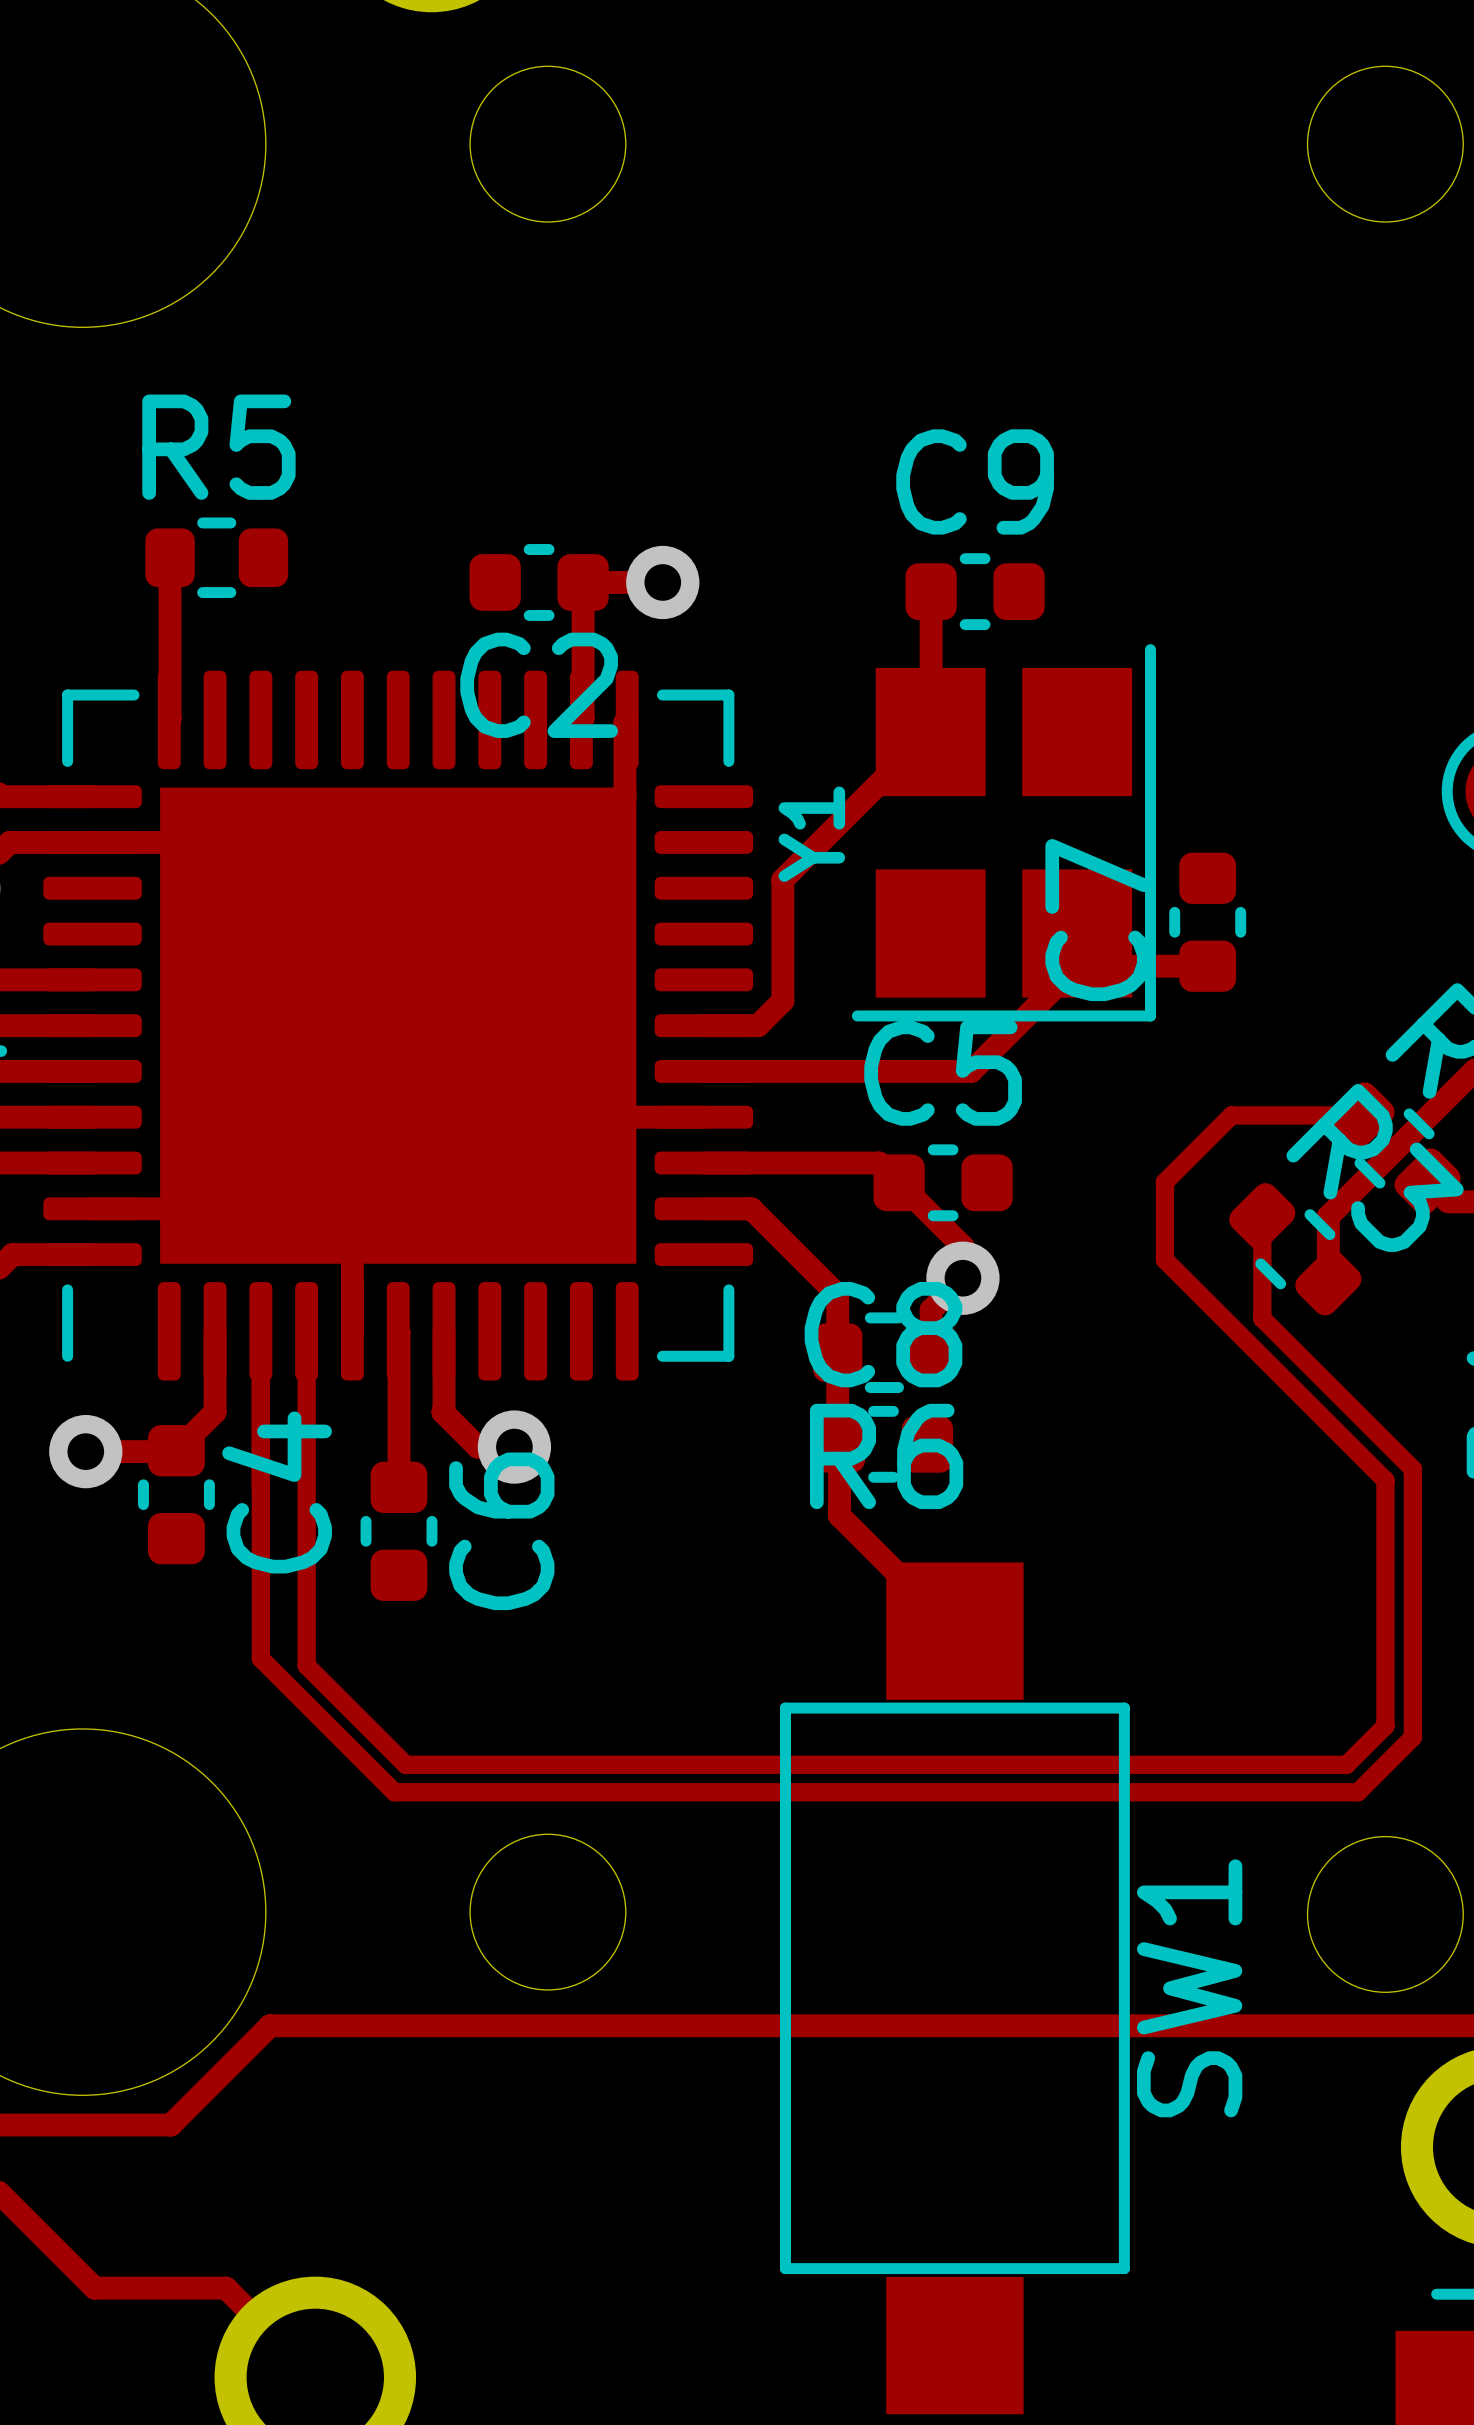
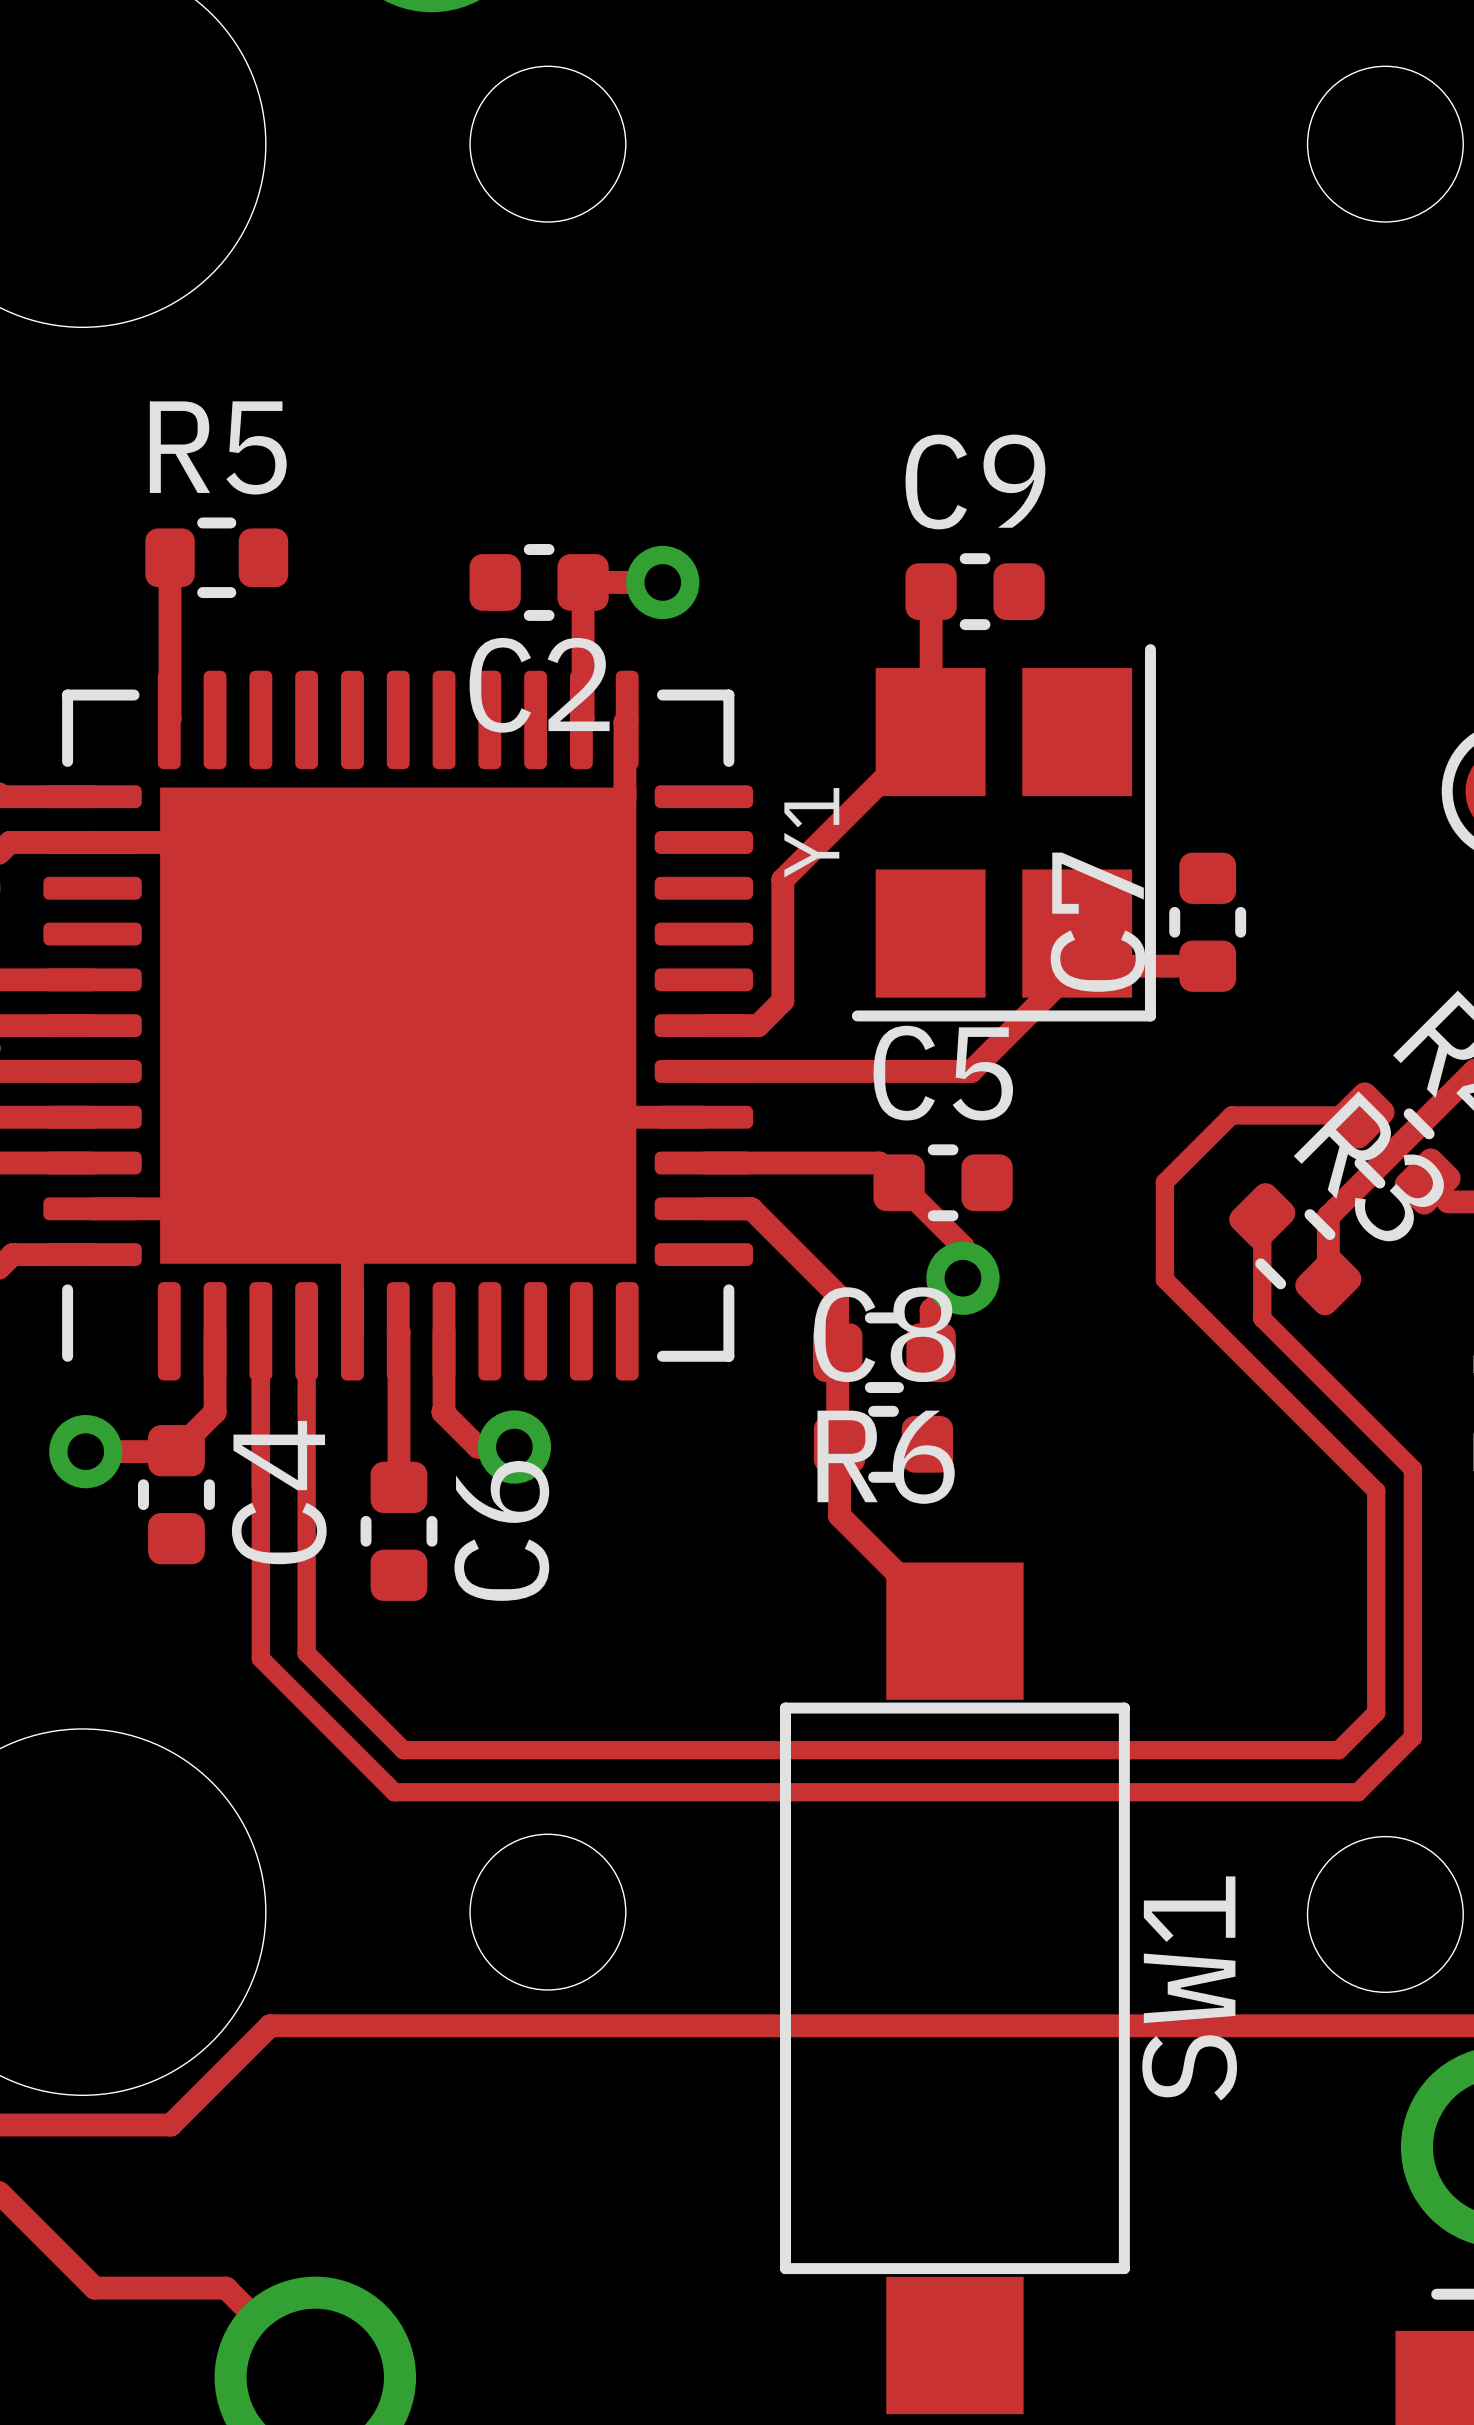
track: (1164, 1259) (1385, 1480) (1385, 1725) (1346, 1764) (405, 1764) (306, 1665) (306, 1653) -> (1164, 1259) (1164, 1279) (1376, 1491) (1376, 1712) (1338, 1750) (403, 1750) (306, 1653)

